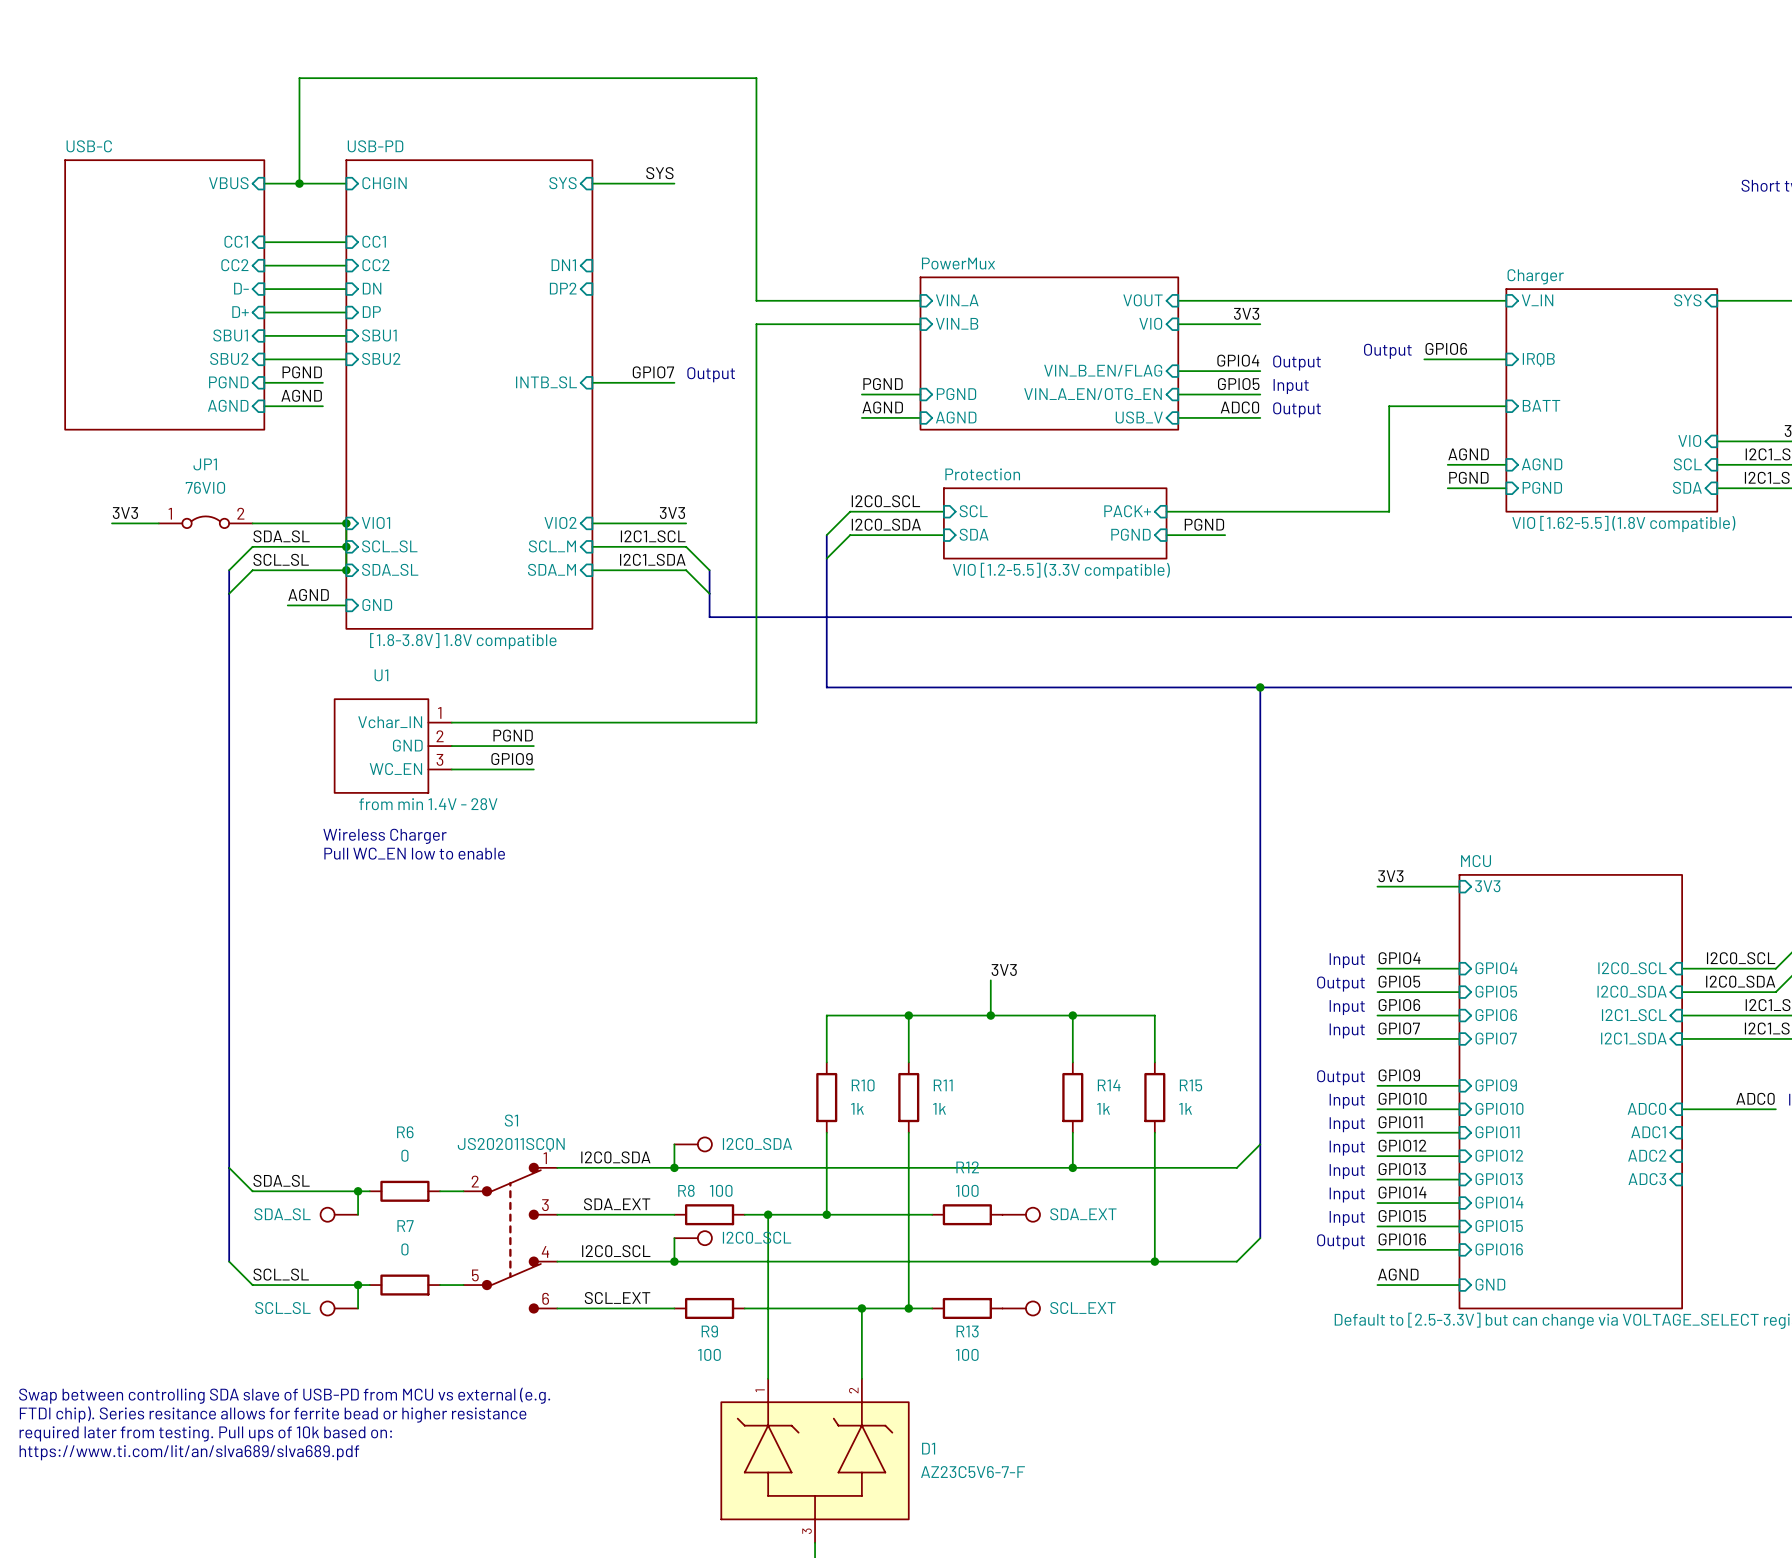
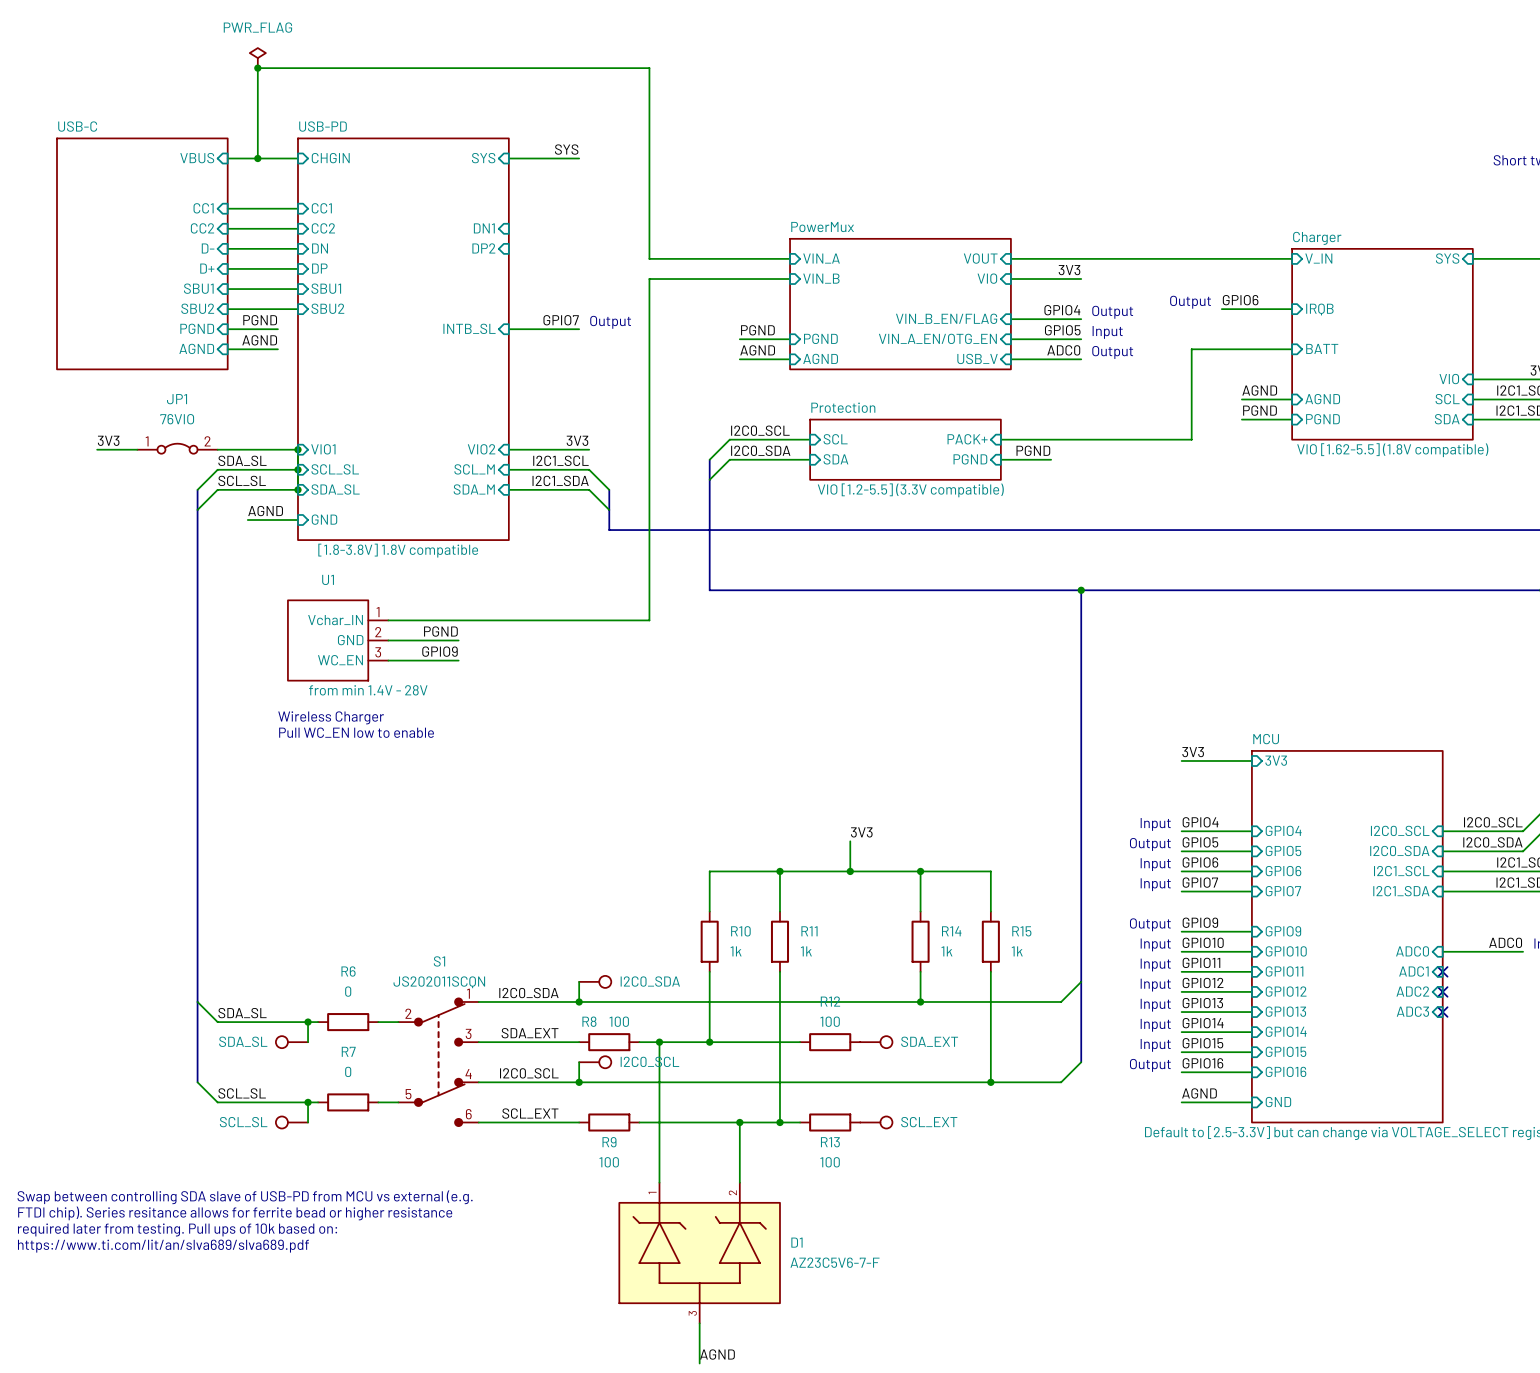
power symbol: none -> PWR_FLAG (257, 58)
junction: none -> (257, 68)
no-connect mark: none -> (1442, 971)
no-connect mark: none -> (1442, 991)
no-connect mark: none -> (1442, 1012)

